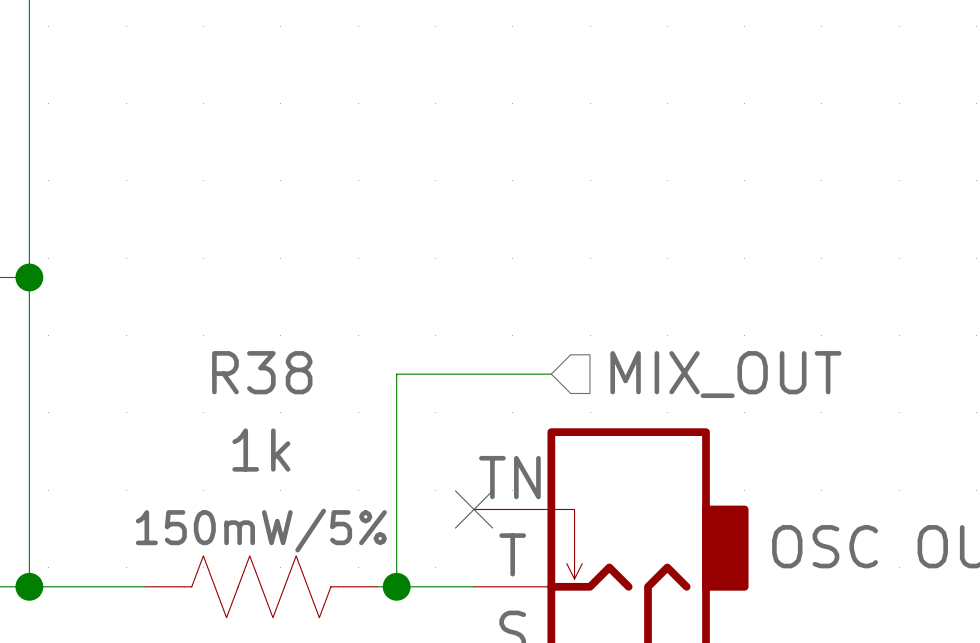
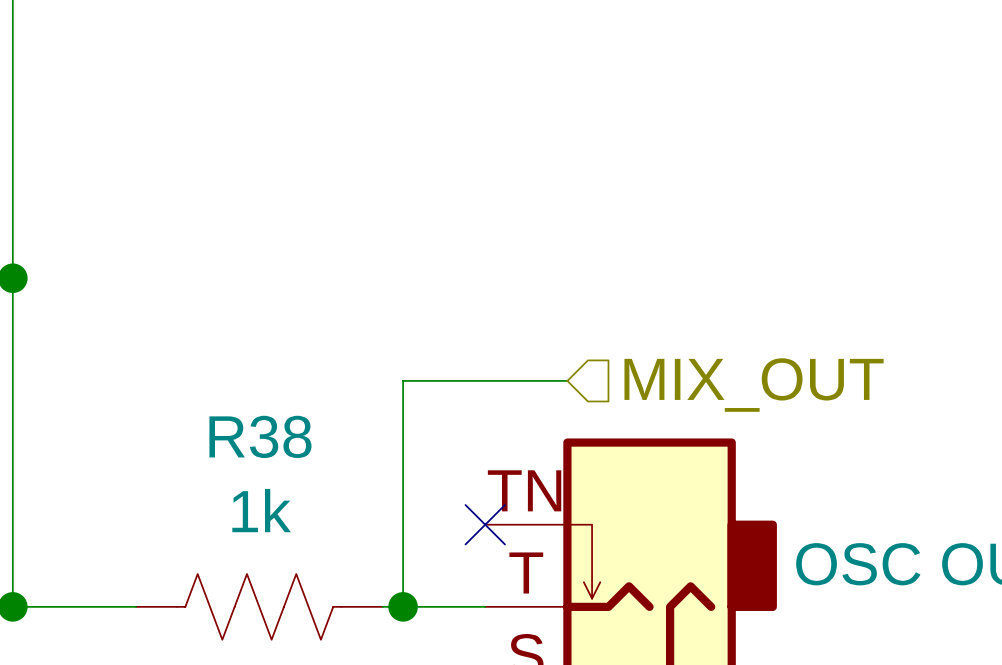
R38 name position: R38 (262, 372) -> R38 (260, 436)
R38 value position: 1k (261, 450) -> 1k (261, 510)
R38 text: 150mW/5% (261, 530) -> none

